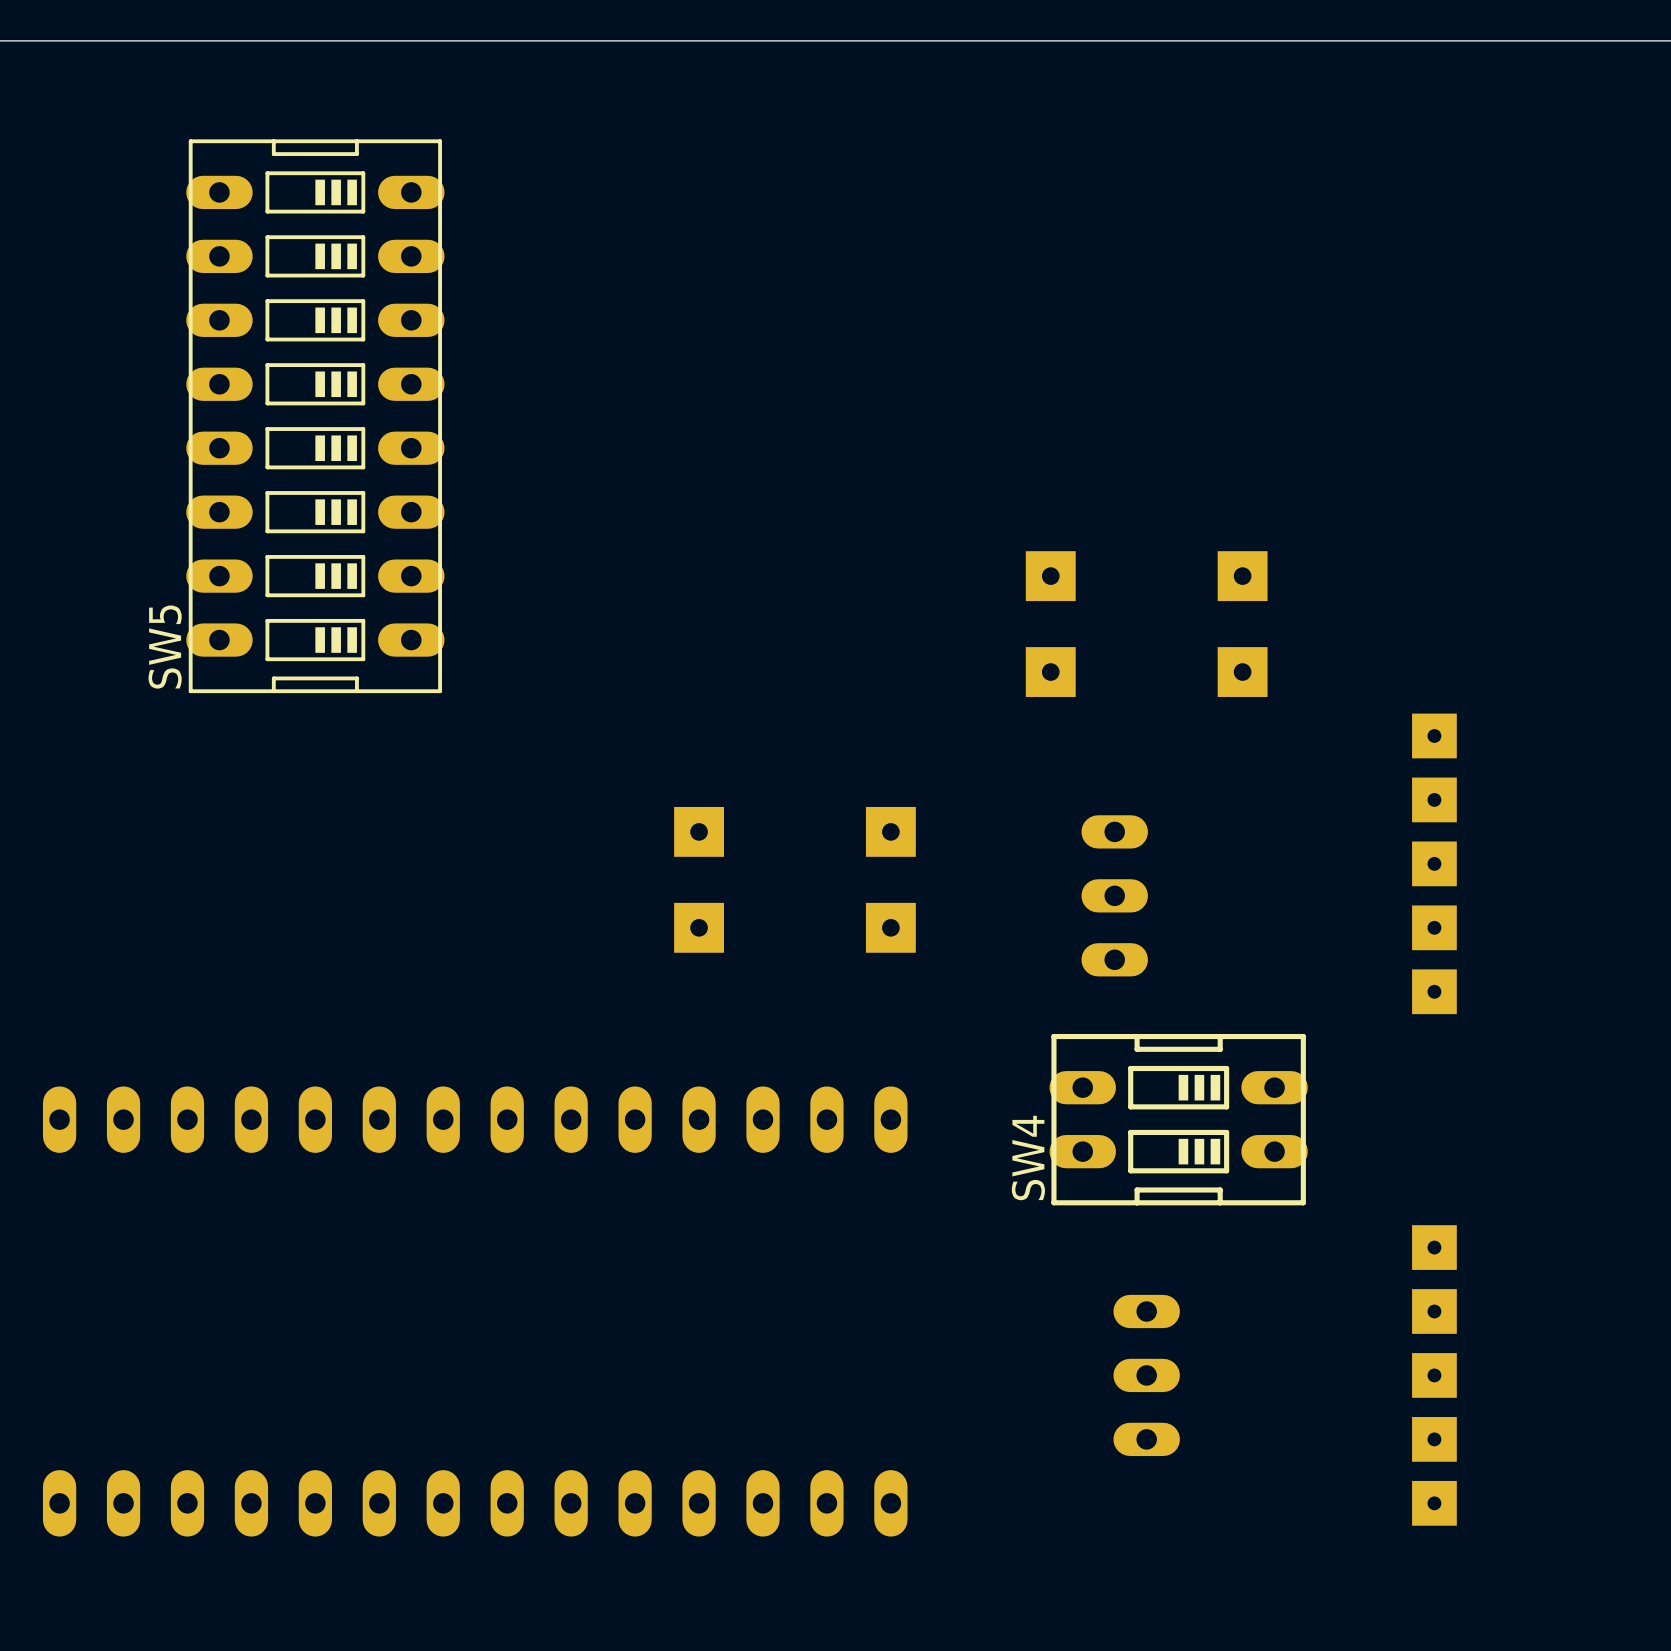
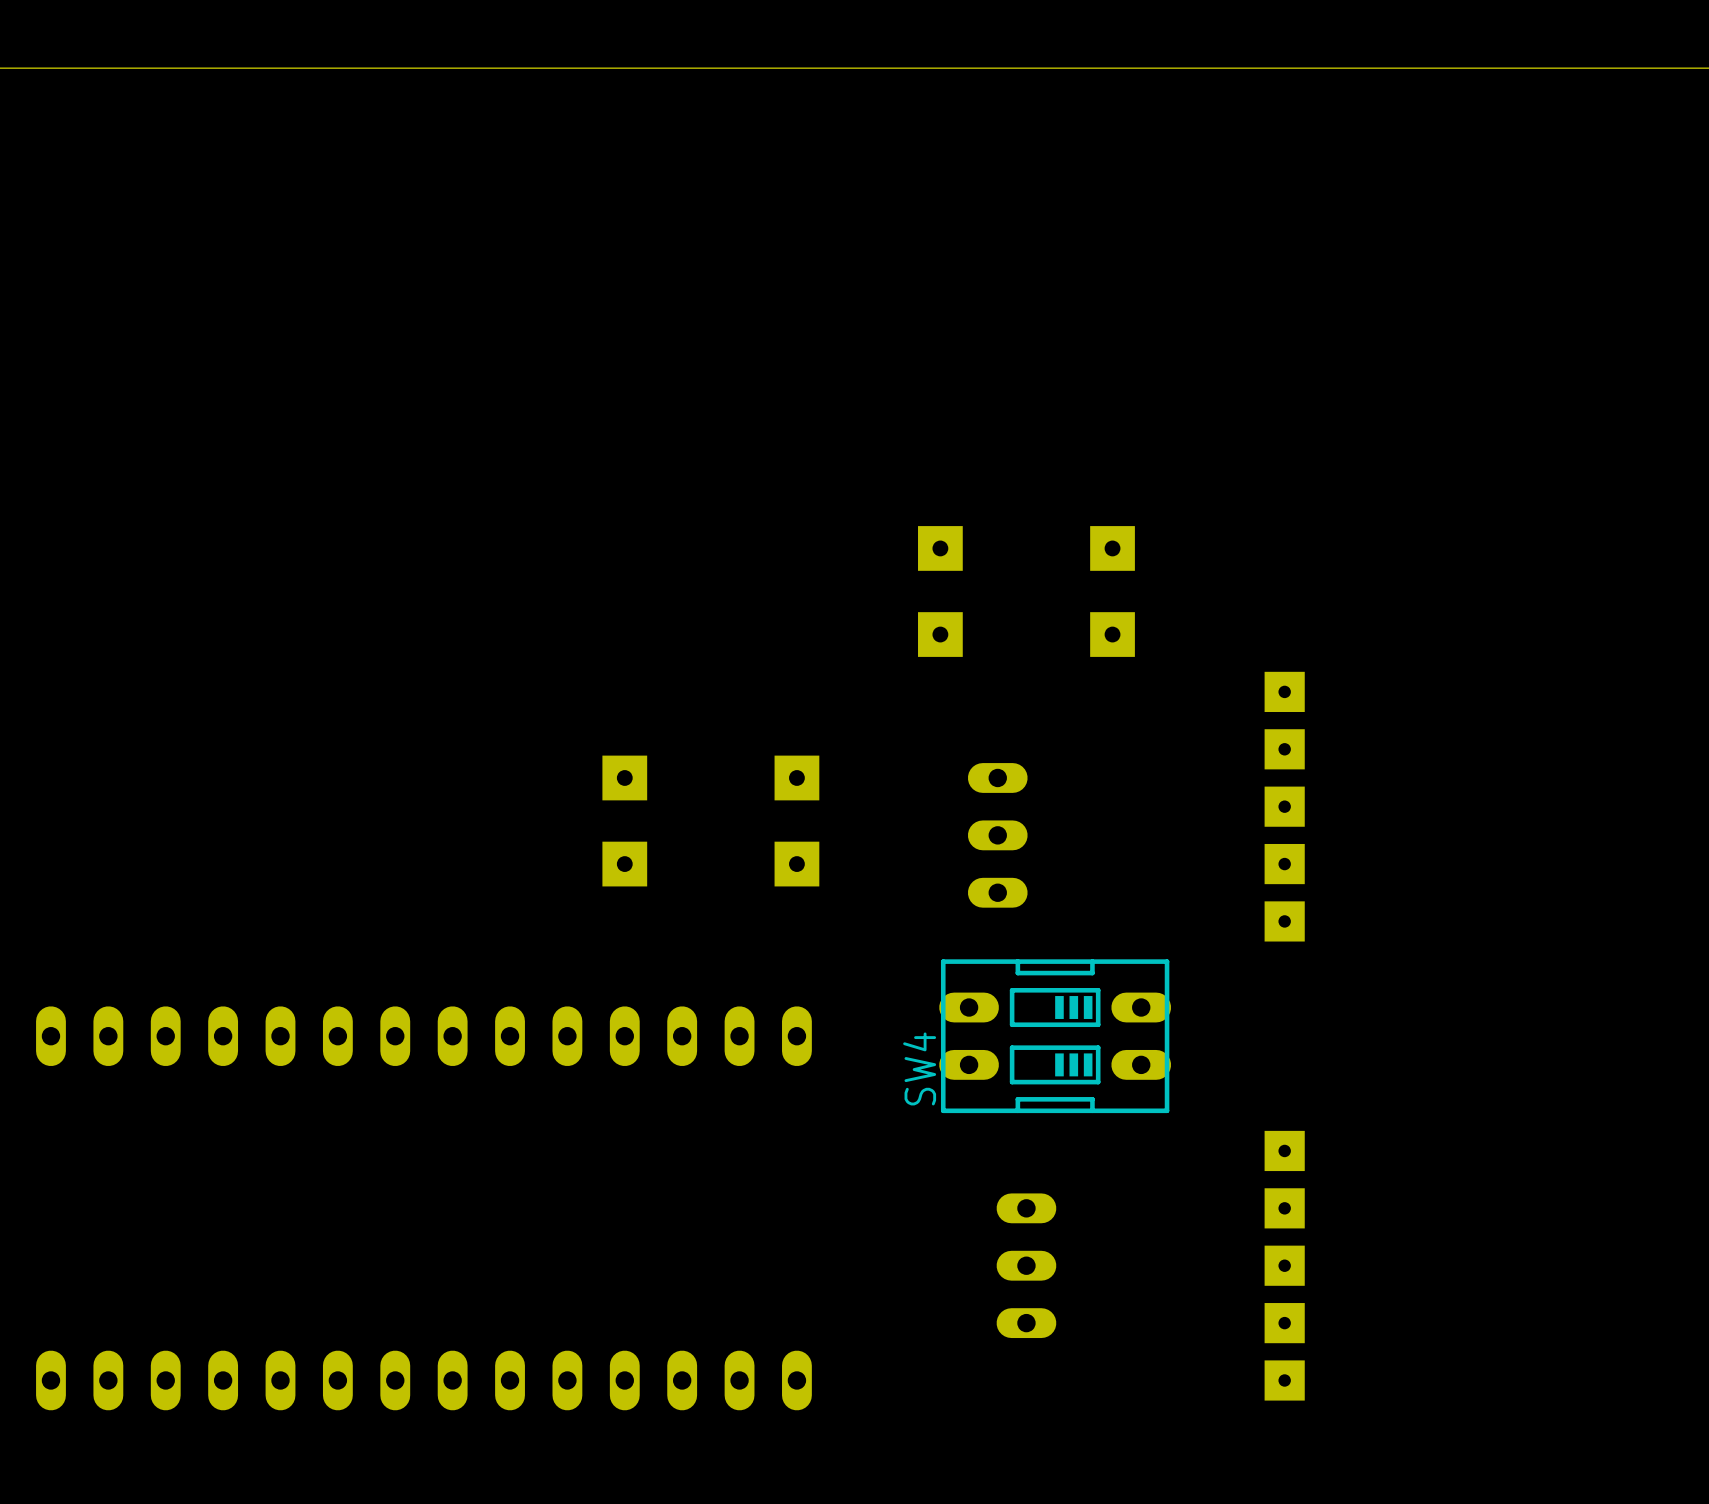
SW5: (315, 416) -> none

